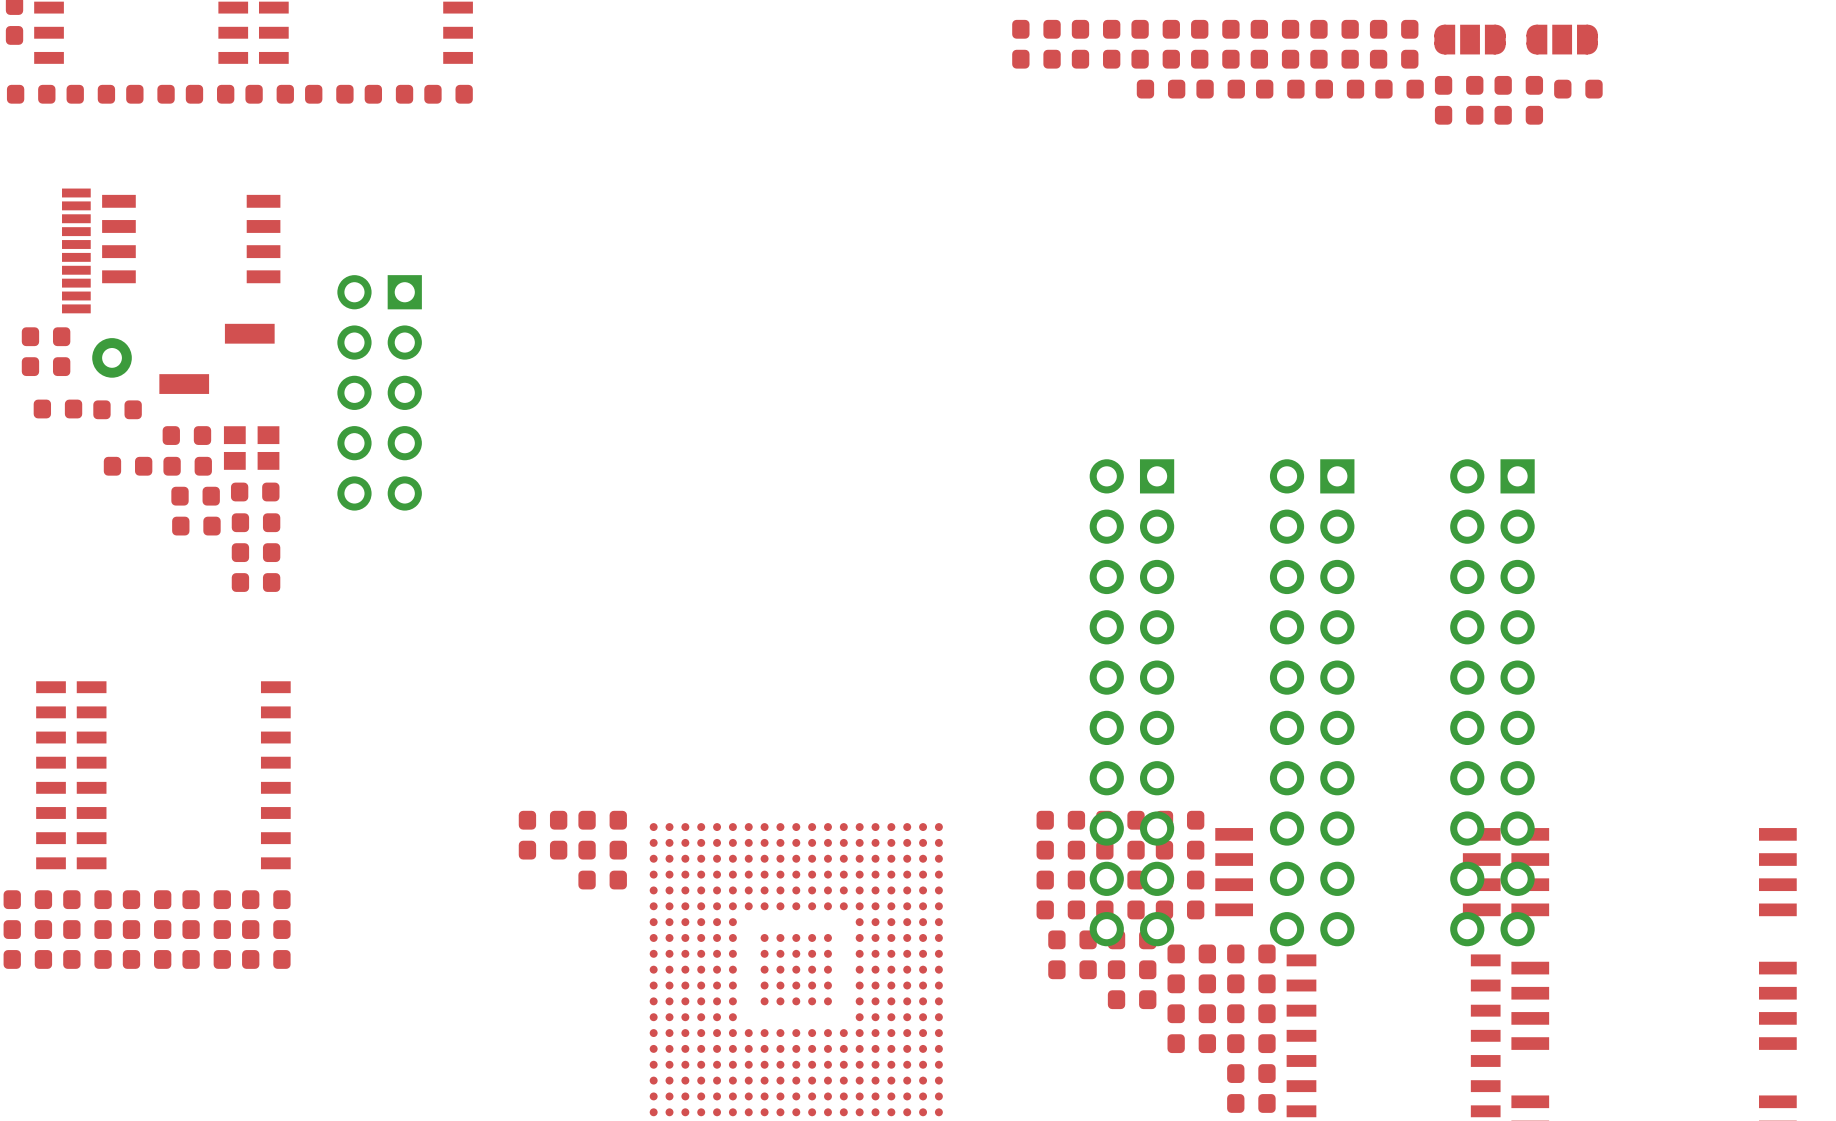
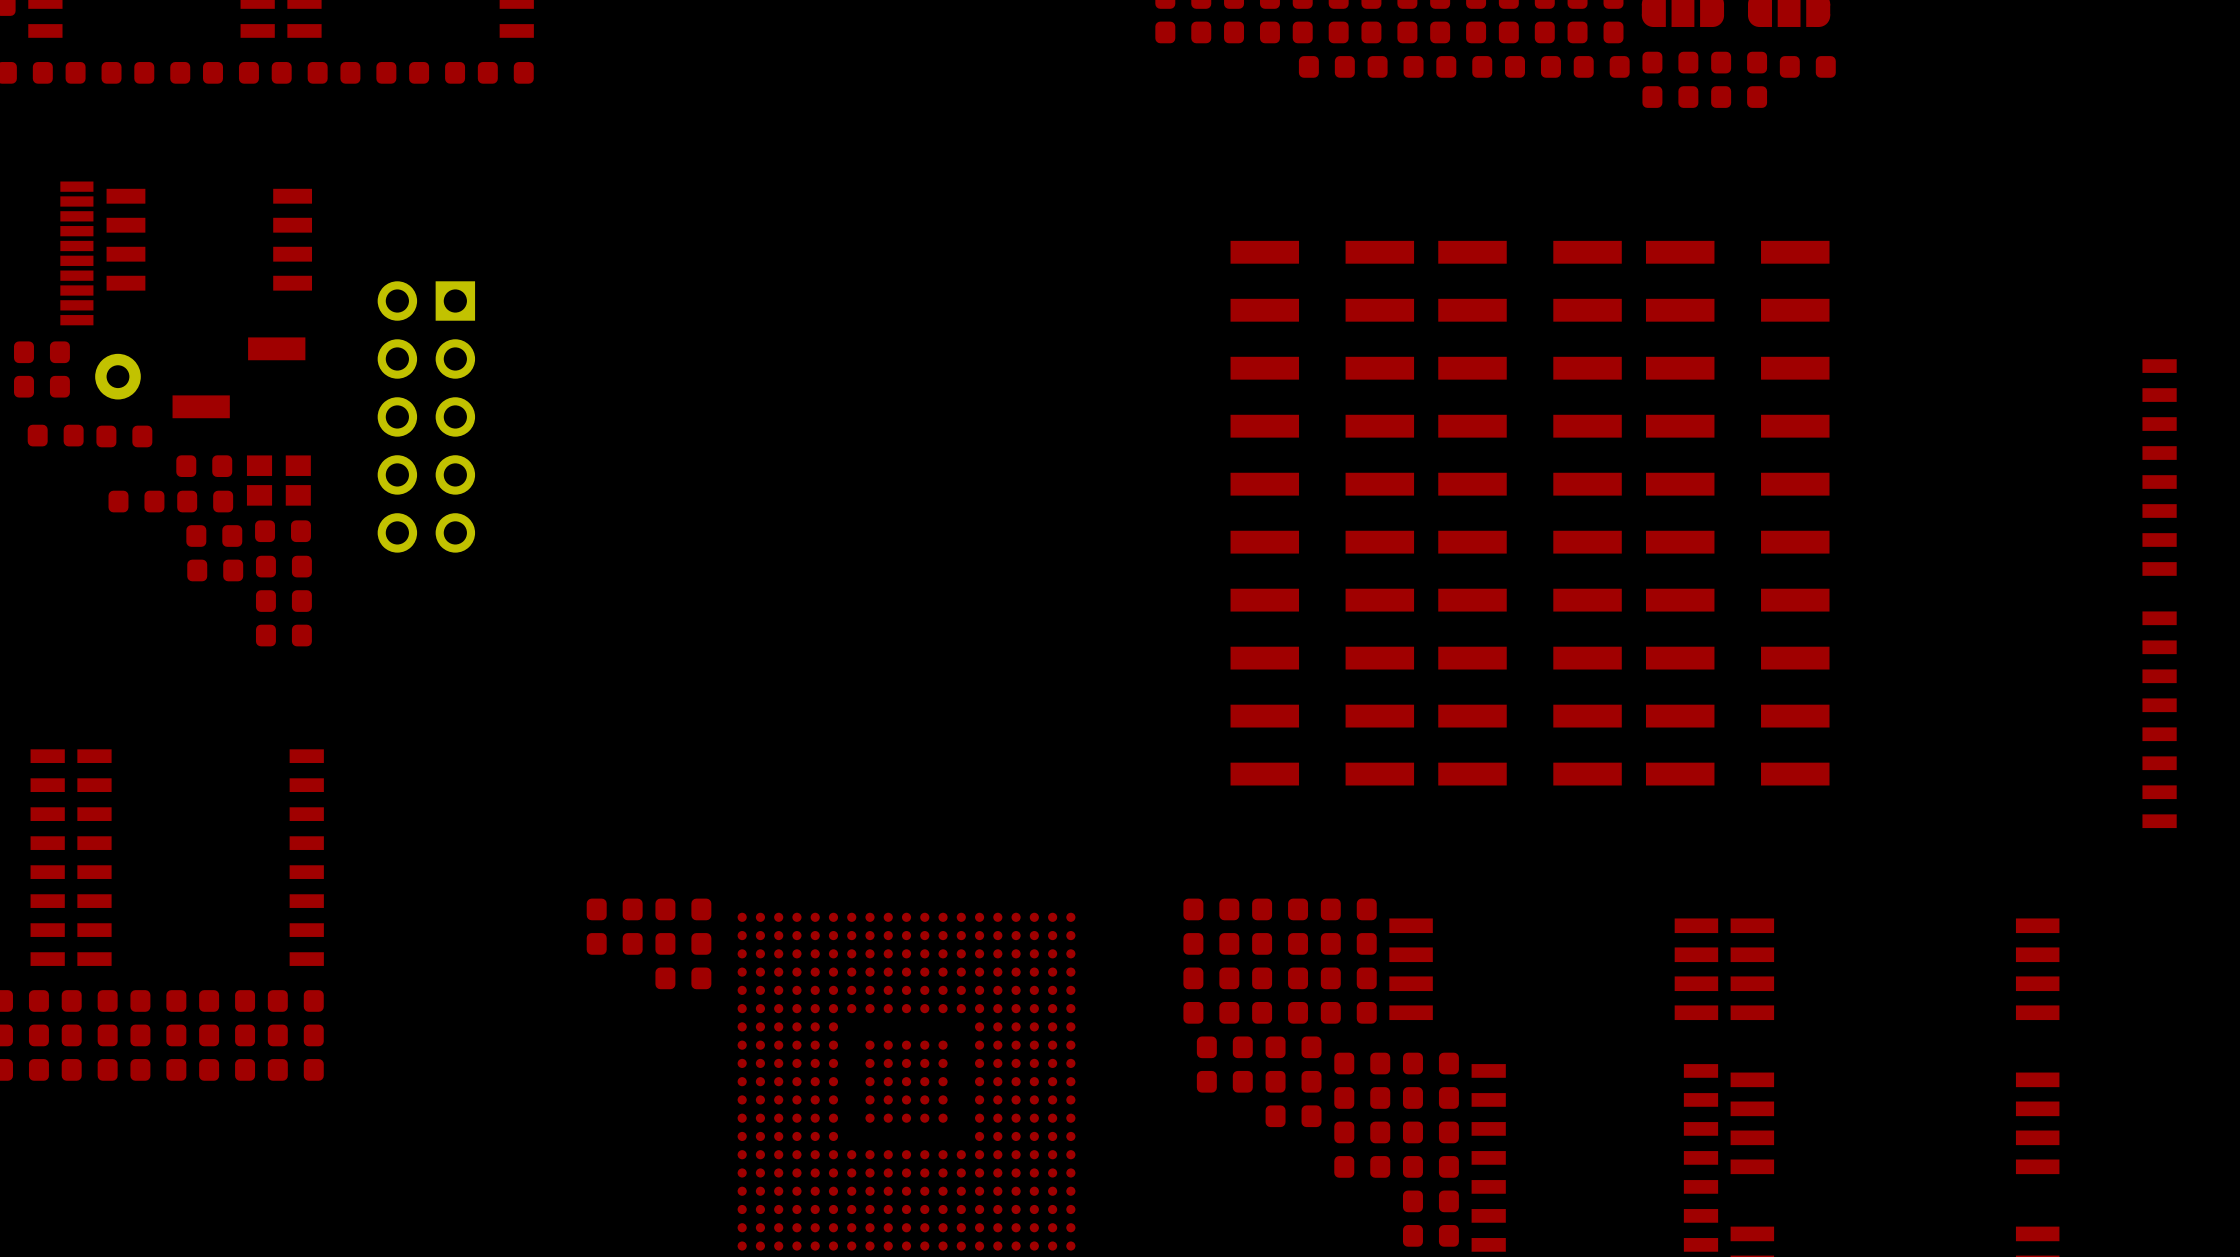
part: none -> (1322, 513)
part: none -> (1530, 513)
part: none -> (1737, 513)
part: (1131, 702) -> none
part: (1312, 702) -> none
part: (1492, 702) -> none

